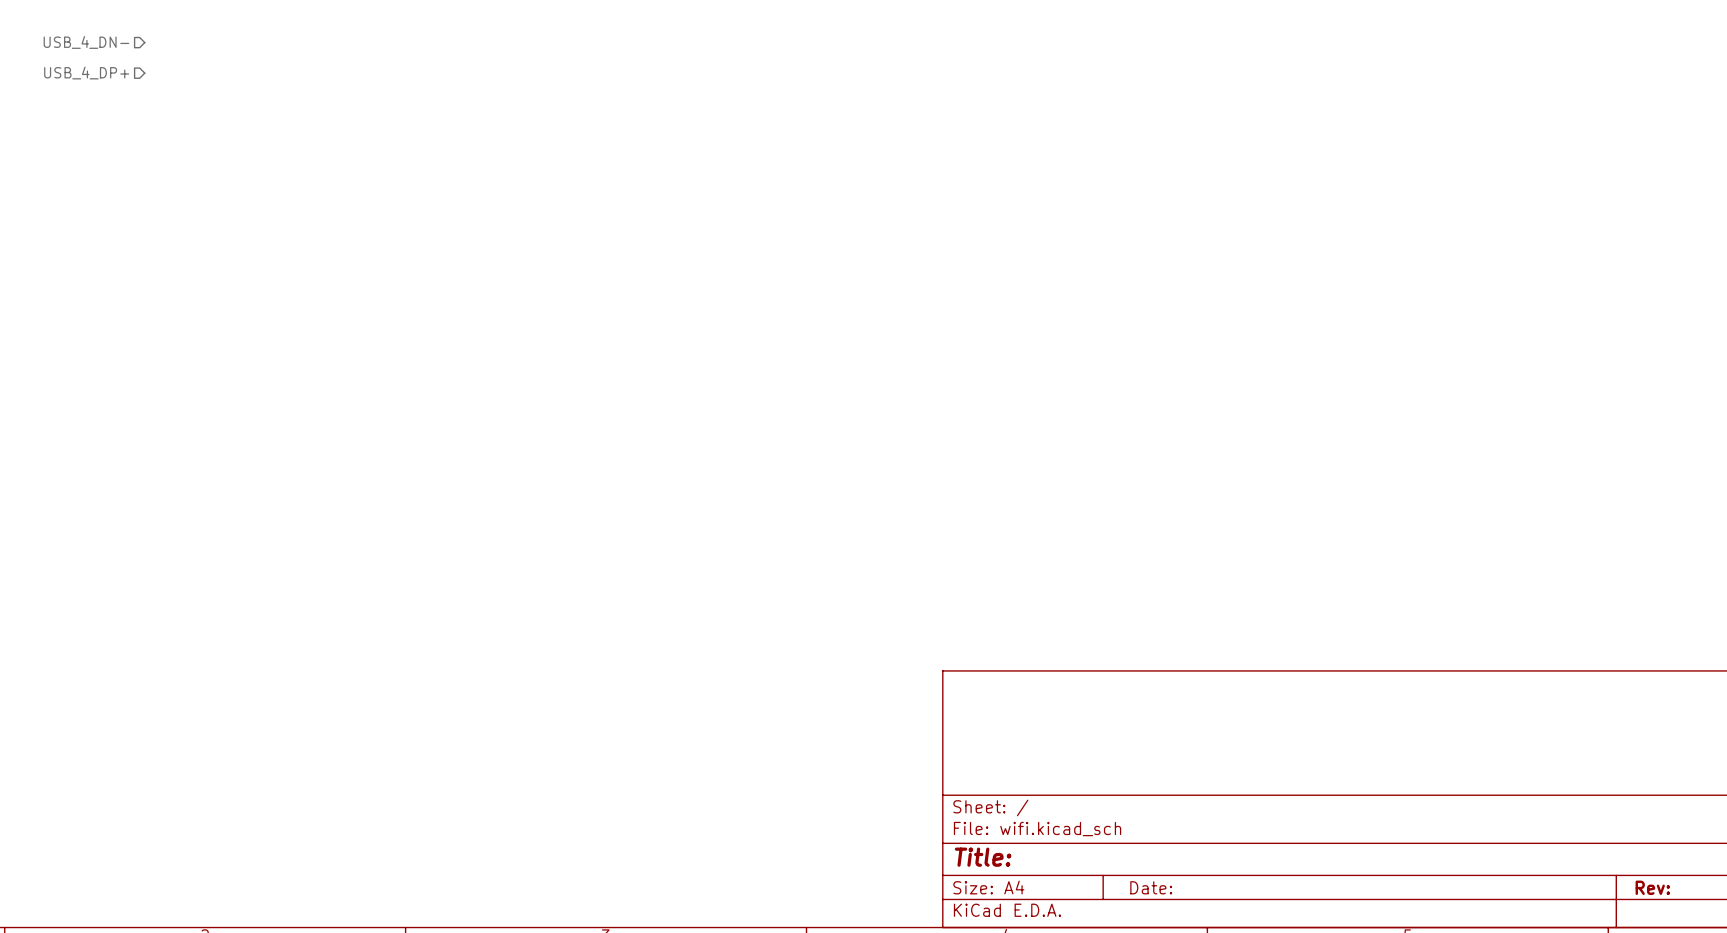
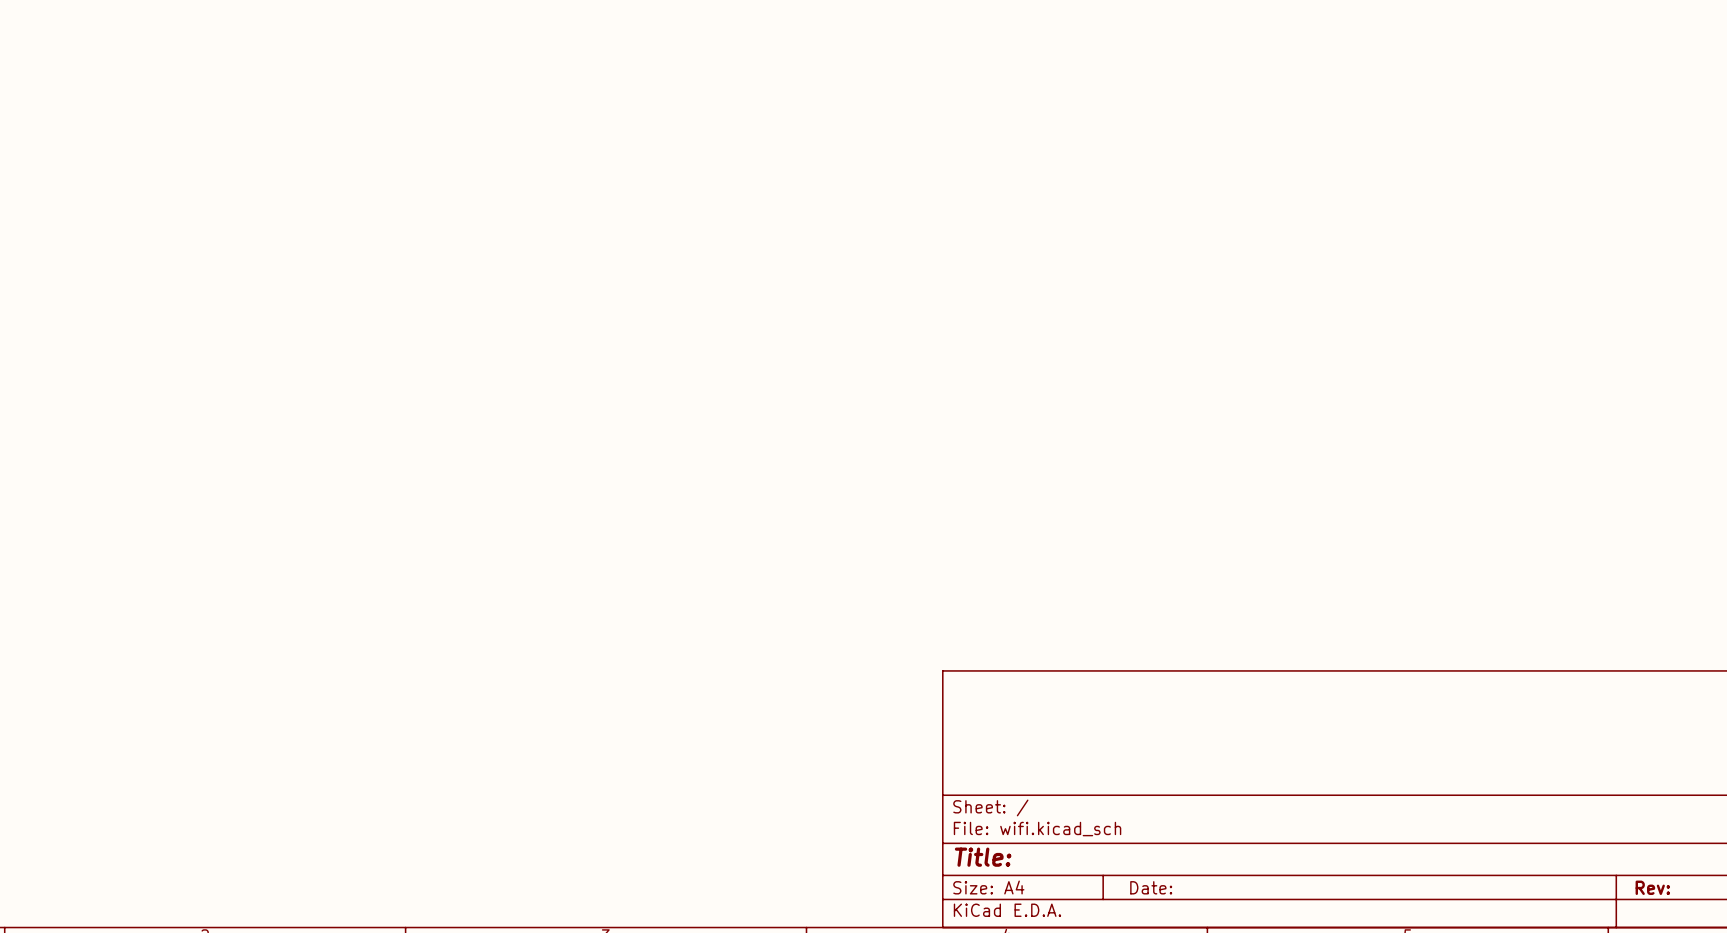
hierarchical label: USB_4_DN- (86, 42) -> none
hierarchical label: USB_4_DP+ (86, 73) -> none

